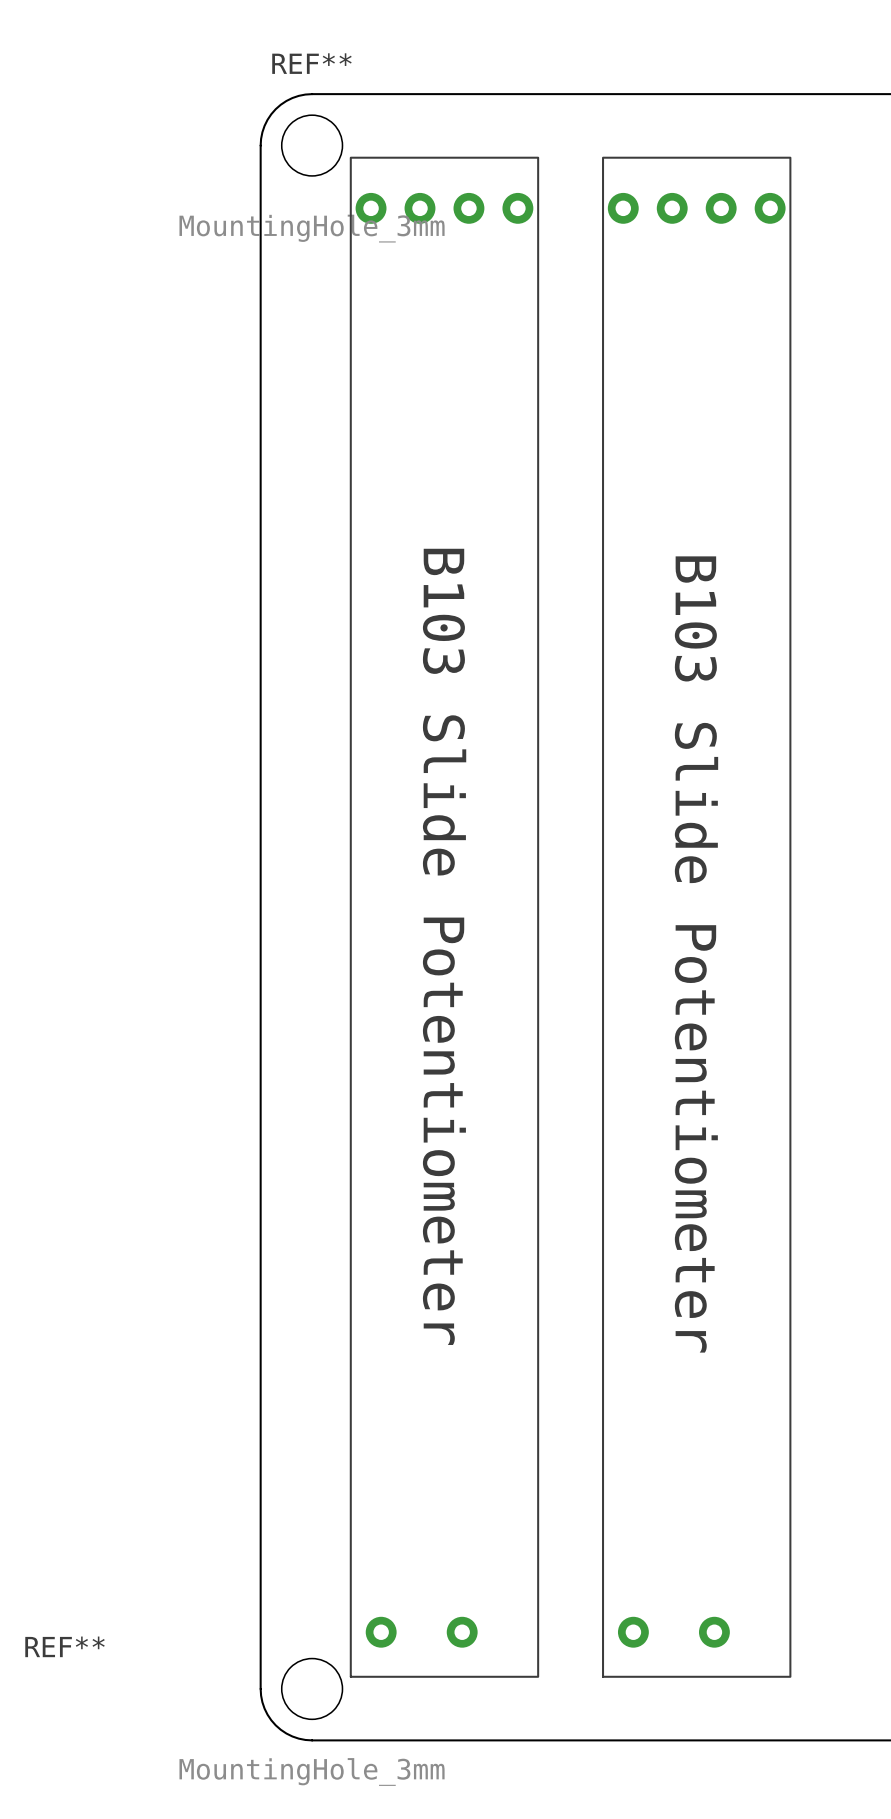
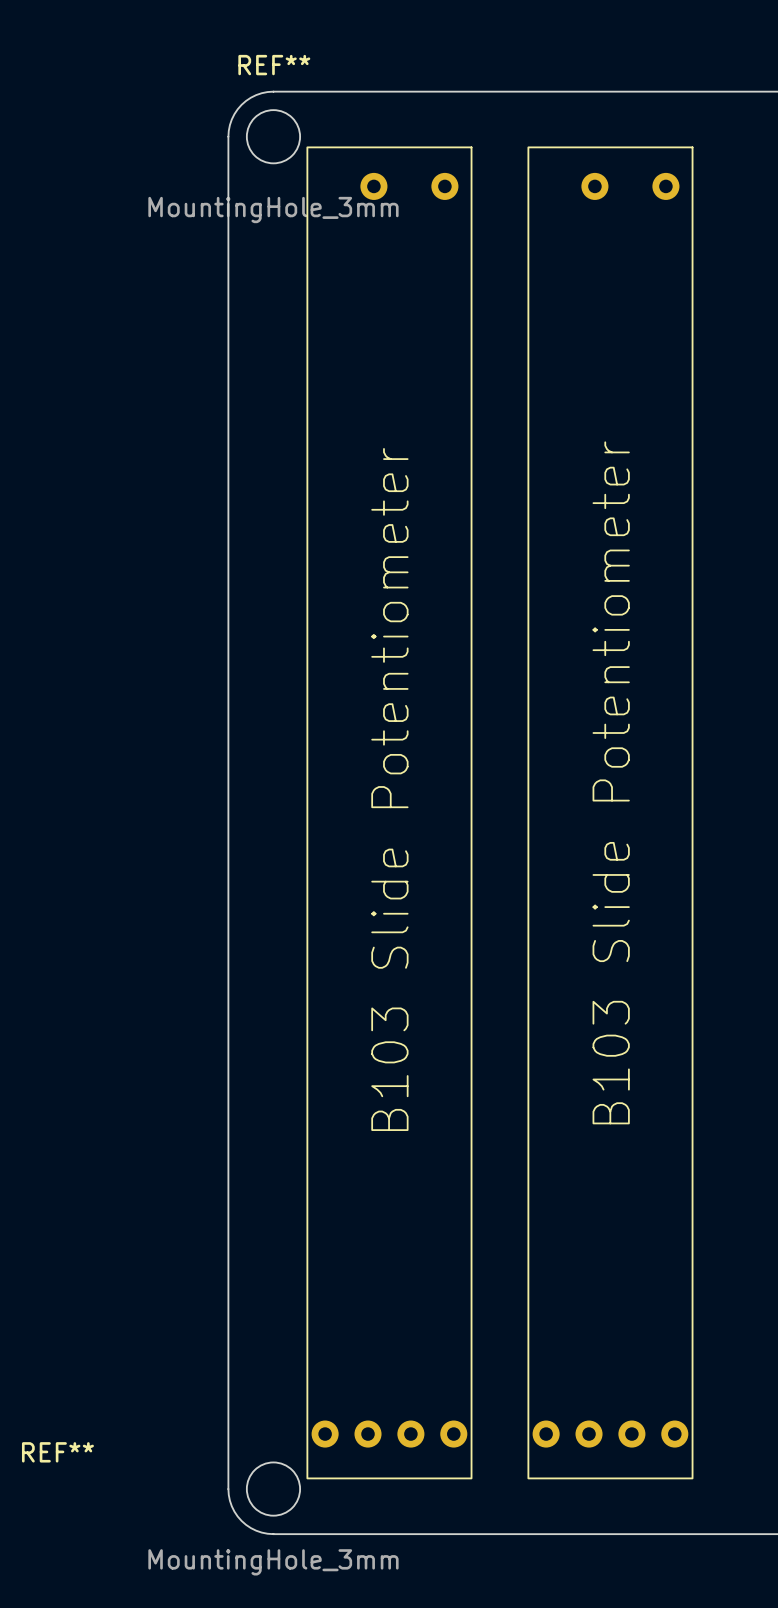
part rotation: 0° (444, 917) -> 180° (389, 812)
part rotation: 0° (696, 917) -> 180° (610, 812)

